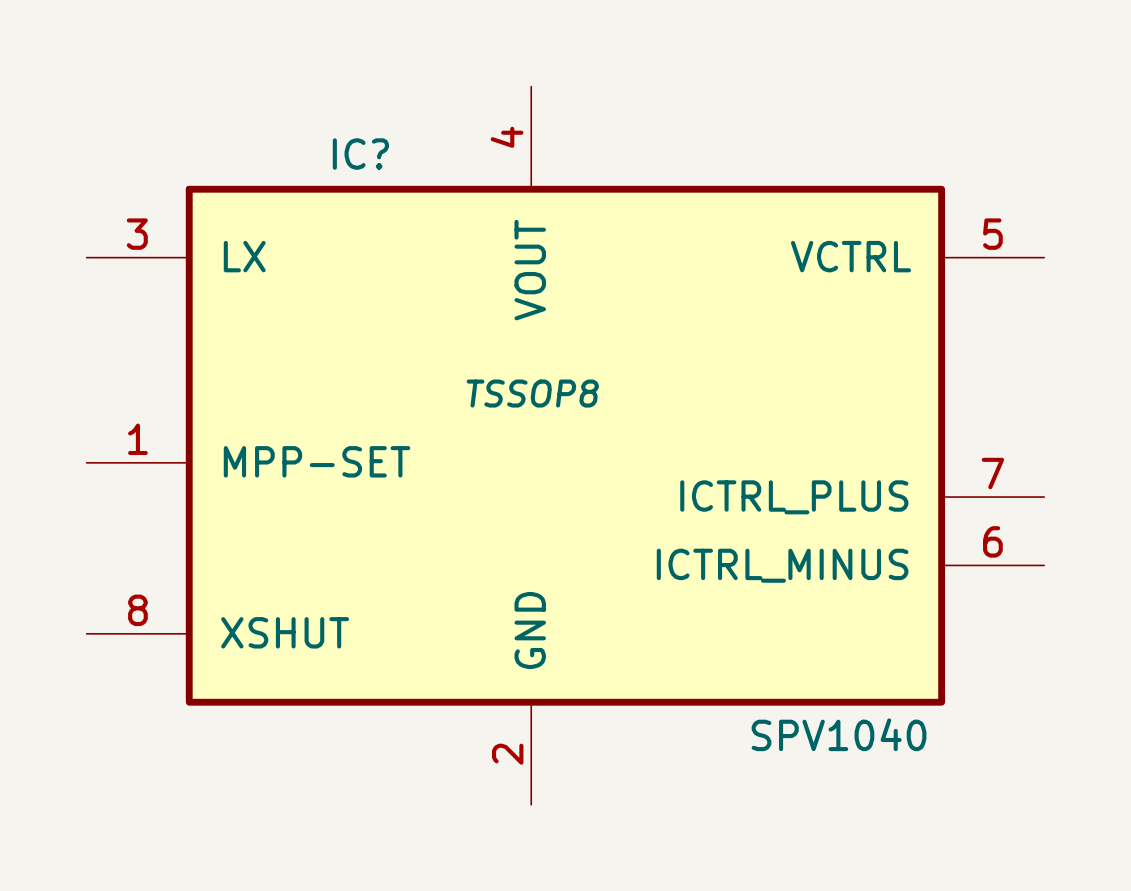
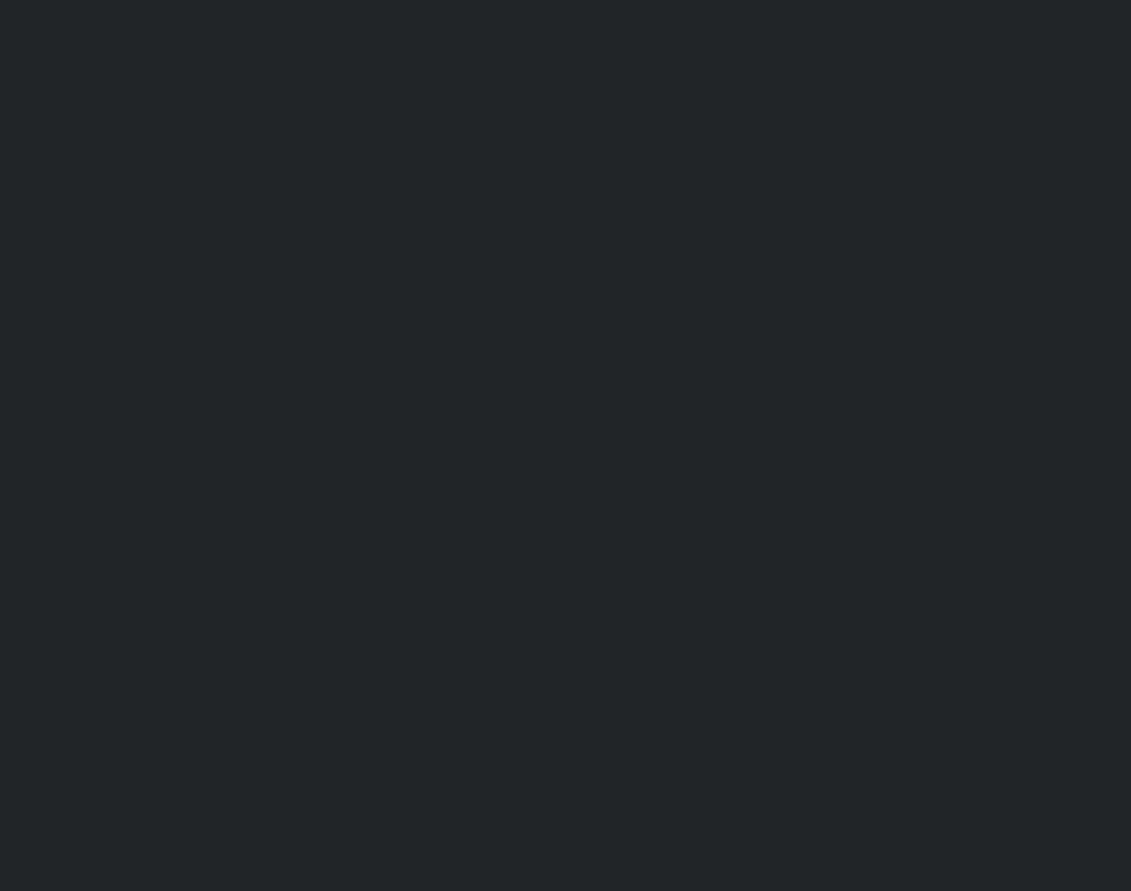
IC?: SPV1040 (565, 445) -> none

